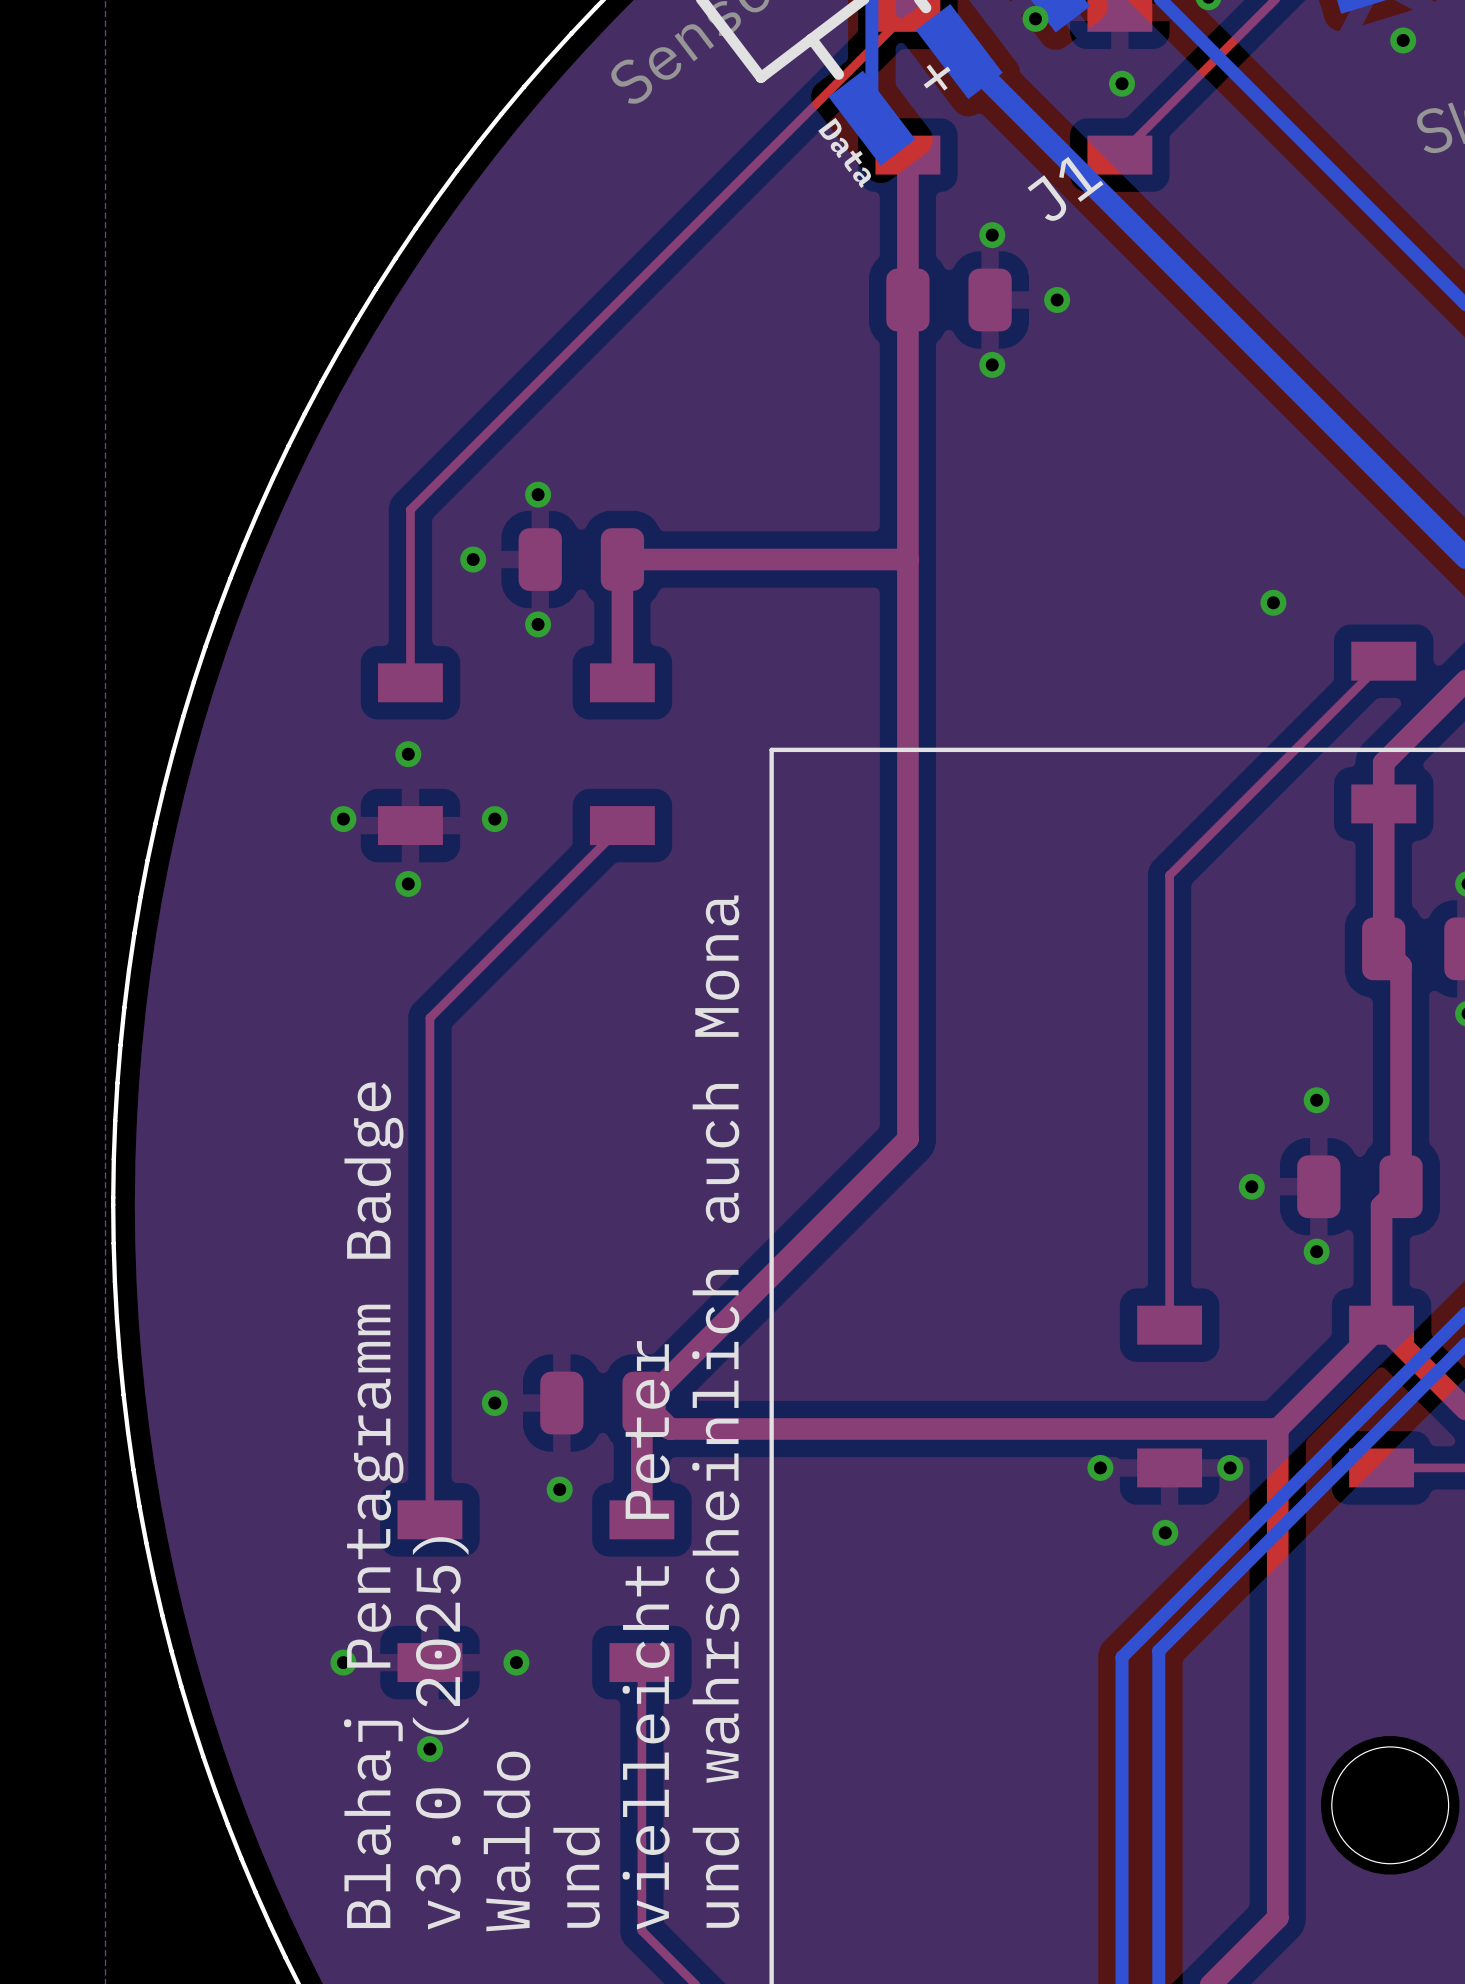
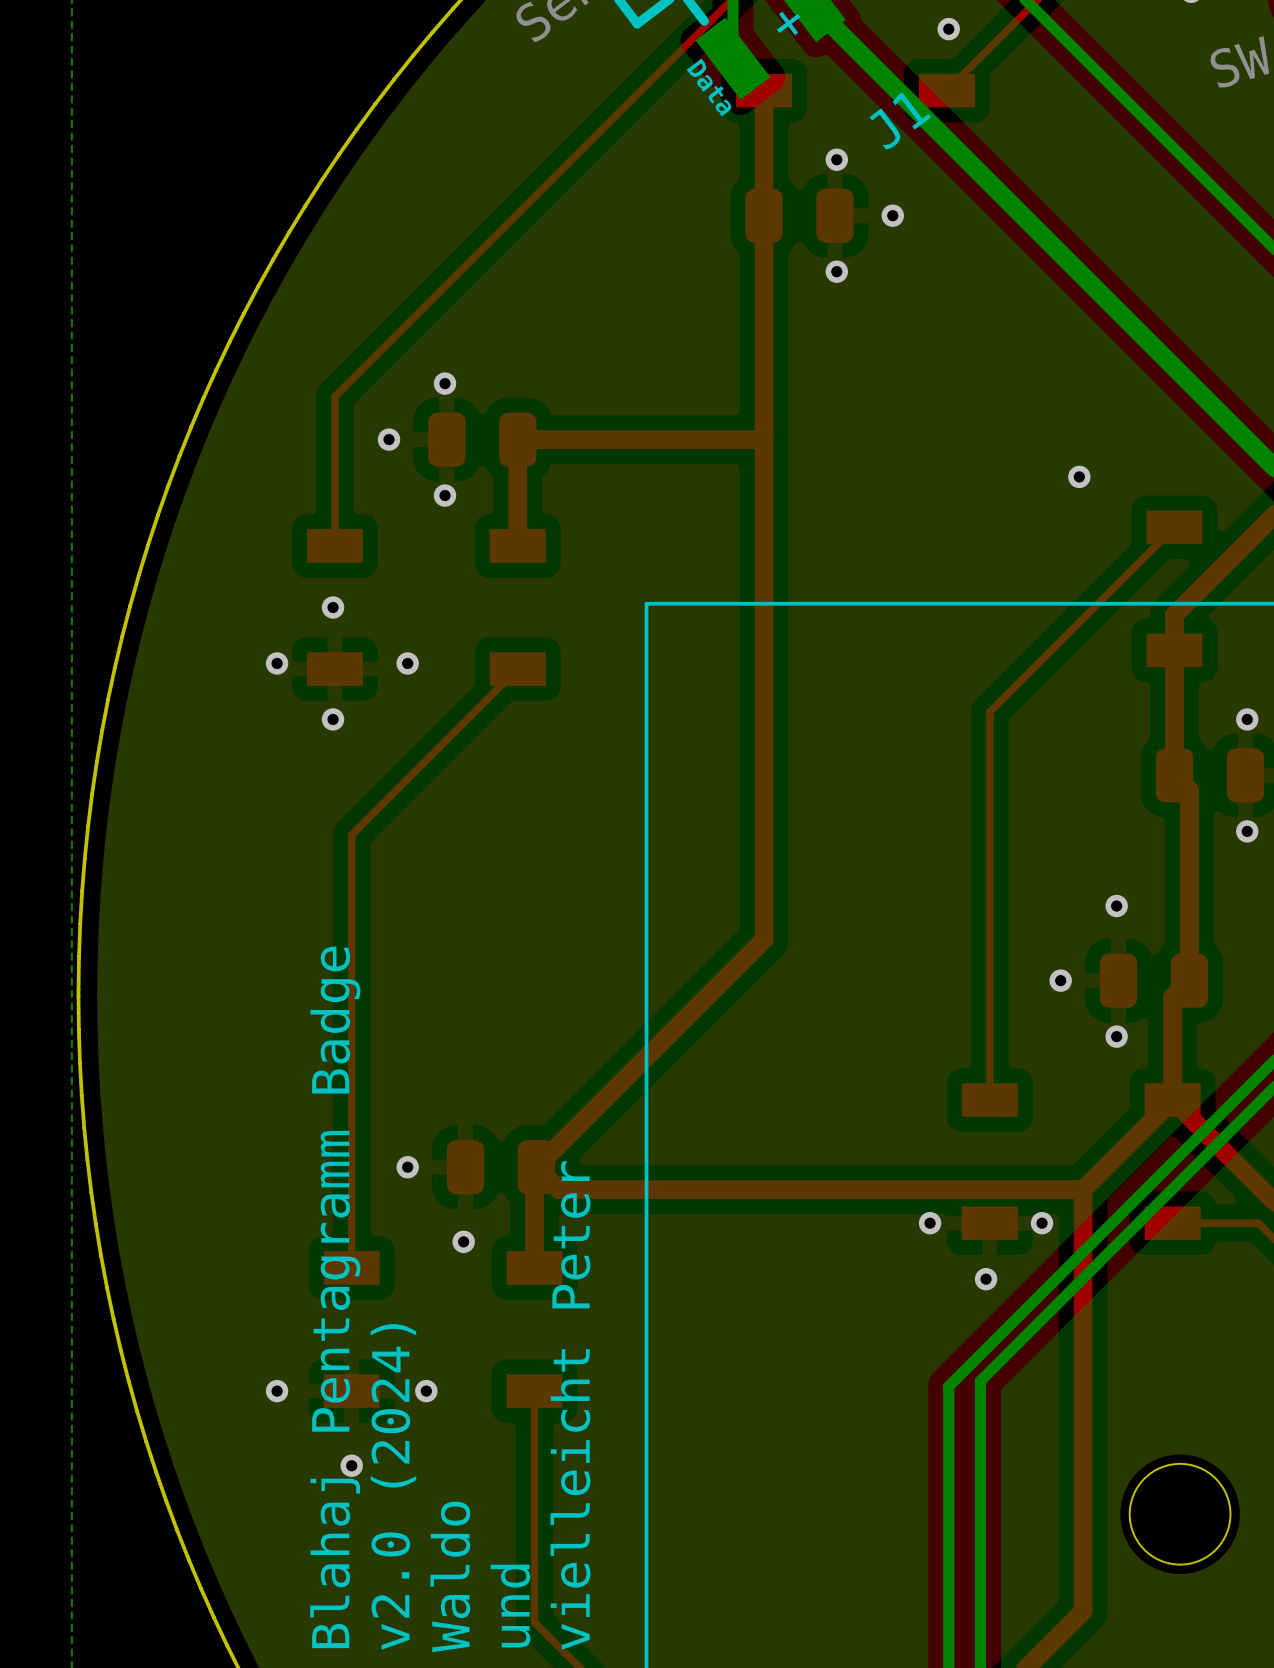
text: und wahrscheinlich auch Mona (715, 1411) -> none
text position: Blahaj Pentagramm Badge (373, 1505) -> Blahaj Pentagramm Badge (335, 1297)
text position: vielleicht Peter (646, 1635) -> vielleicht Peter (570, 1405)
text: v3.0 (2025) (440, 1733) -> v2.0 (2024) (393, 1486)
text position: Waldo (507, 1841) -> Waldo (450, 1576)
text position: und (576, 1877) -> und (510, 1606)

